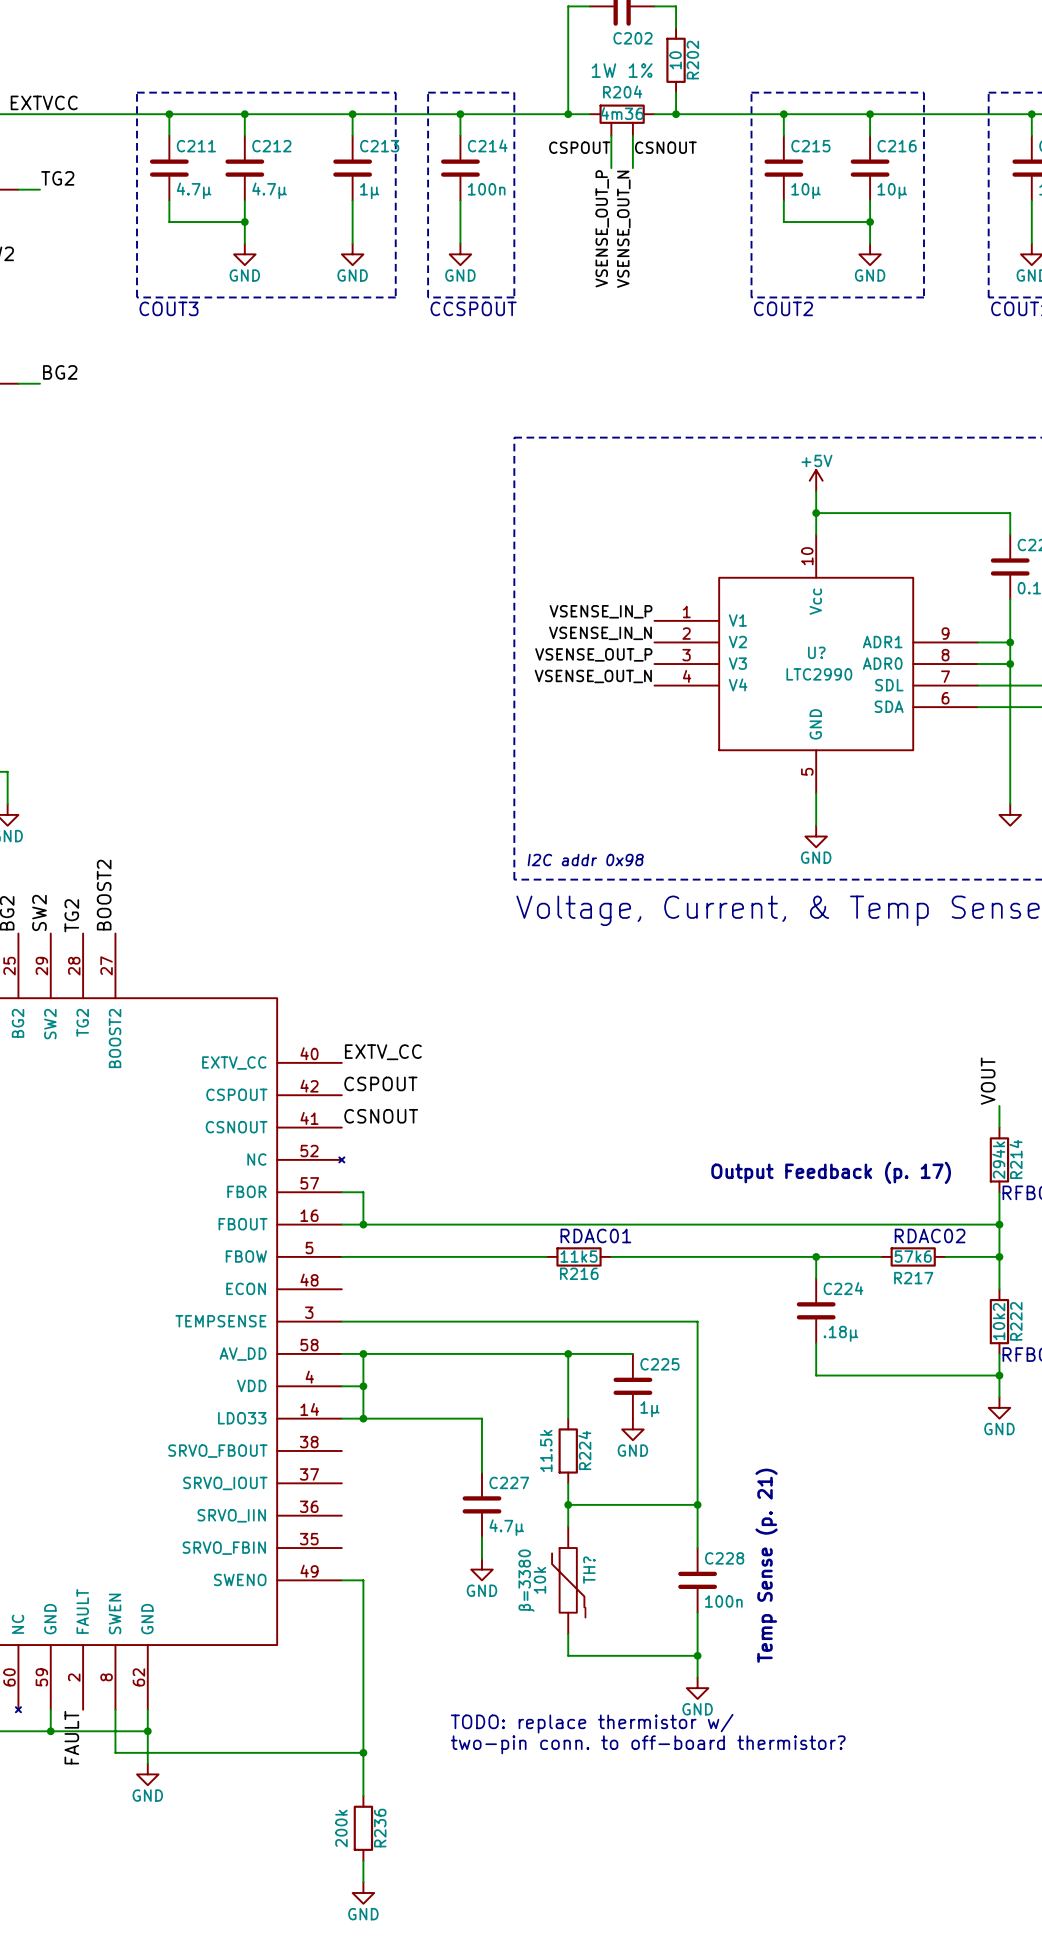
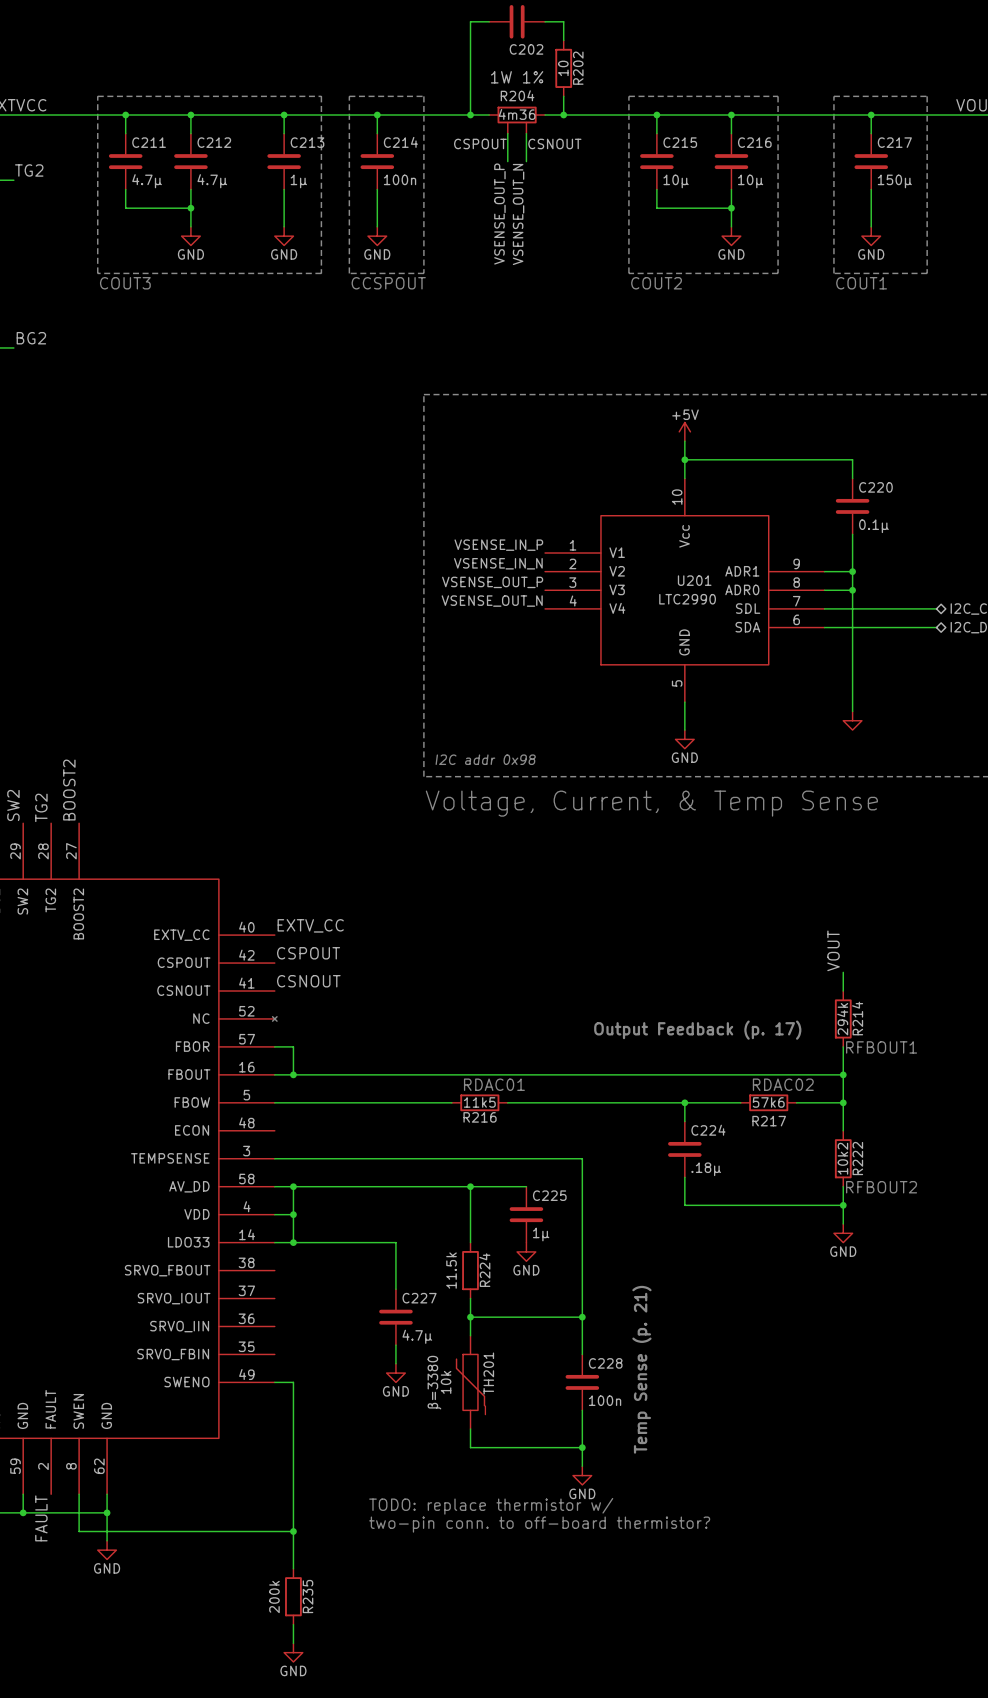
U? name: U? (816, 652) -> U201 (694, 580)
TH? name: TH? (589, 1570) -> TH201 (488, 1373)
R236 name: R236 (380, 1828) -> R235 (308, 1596)

